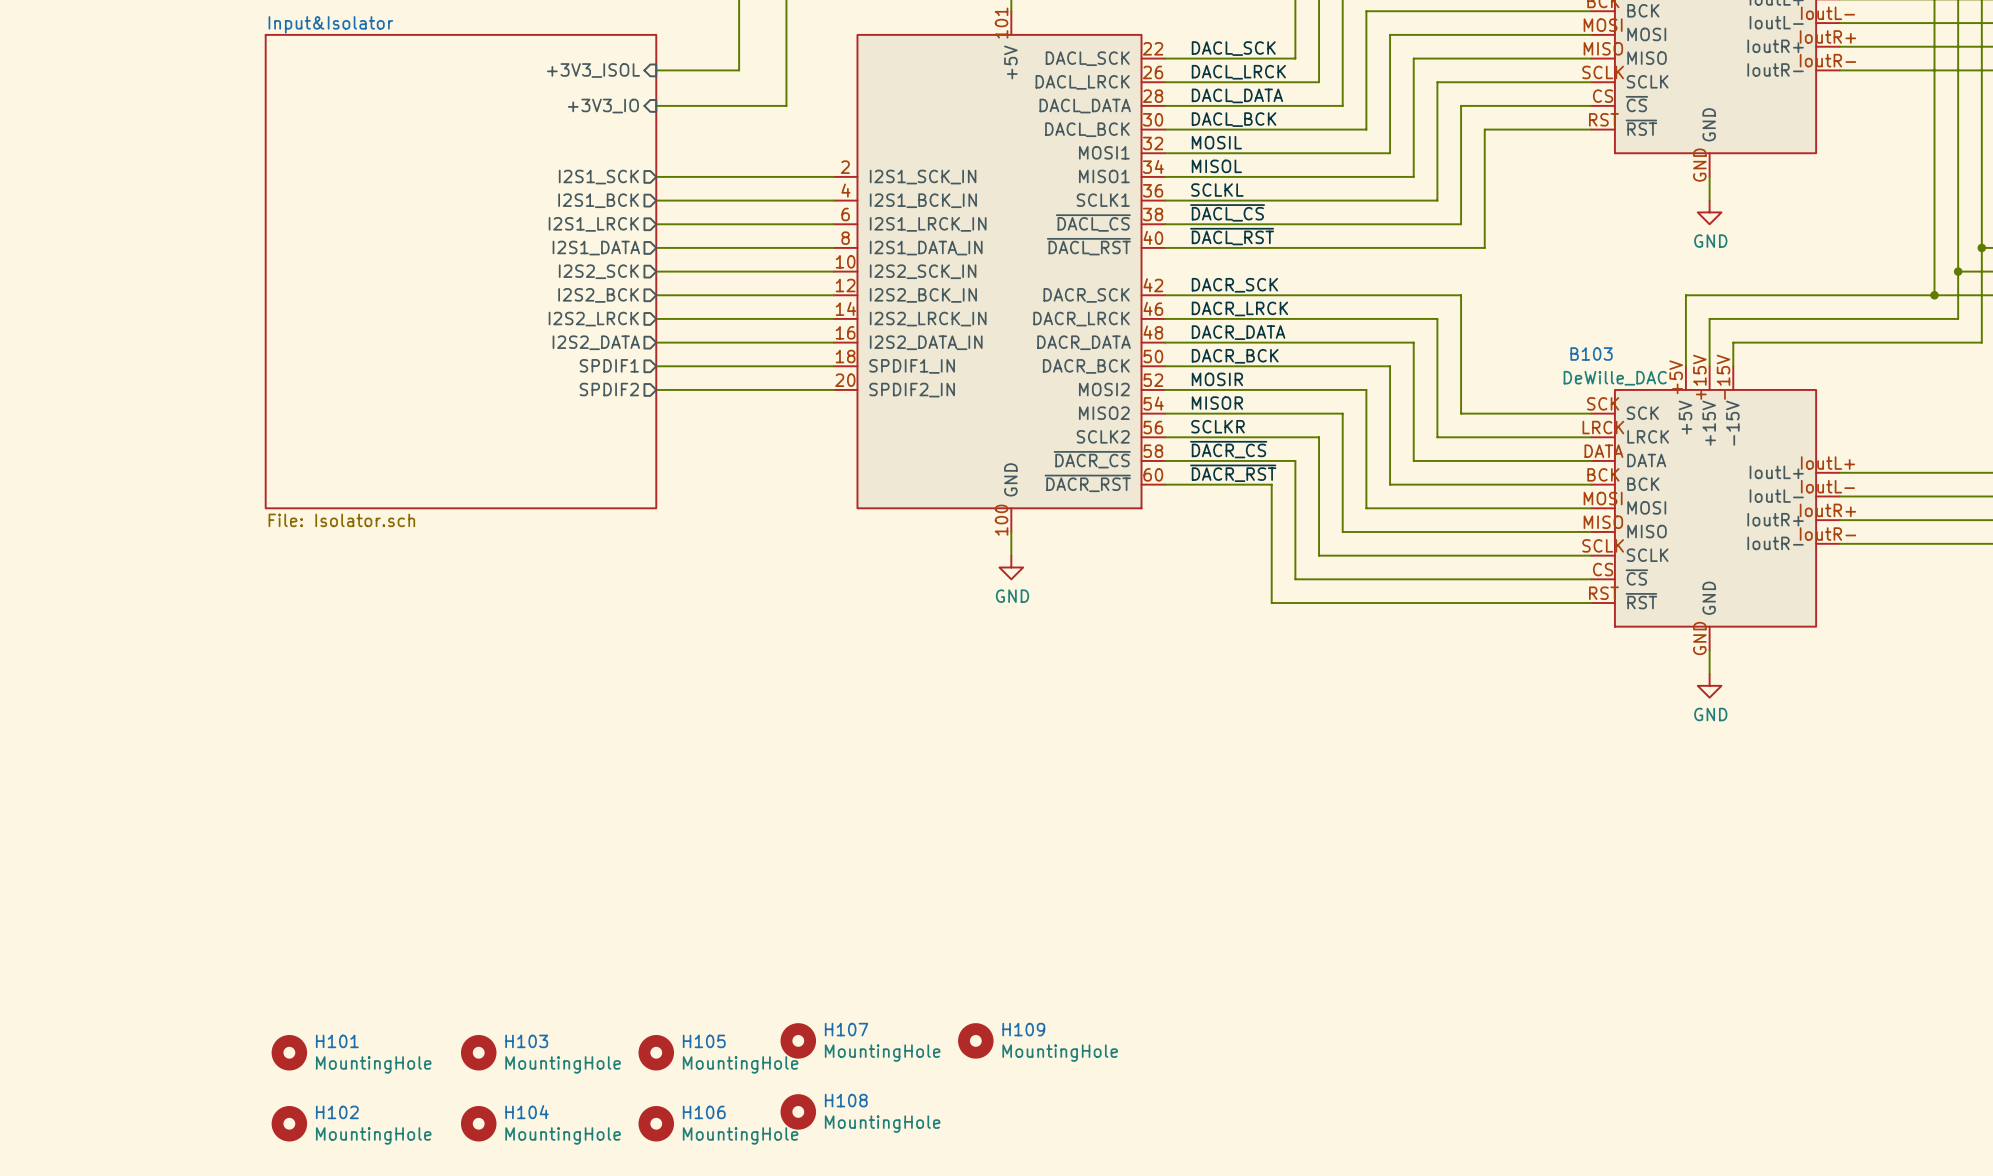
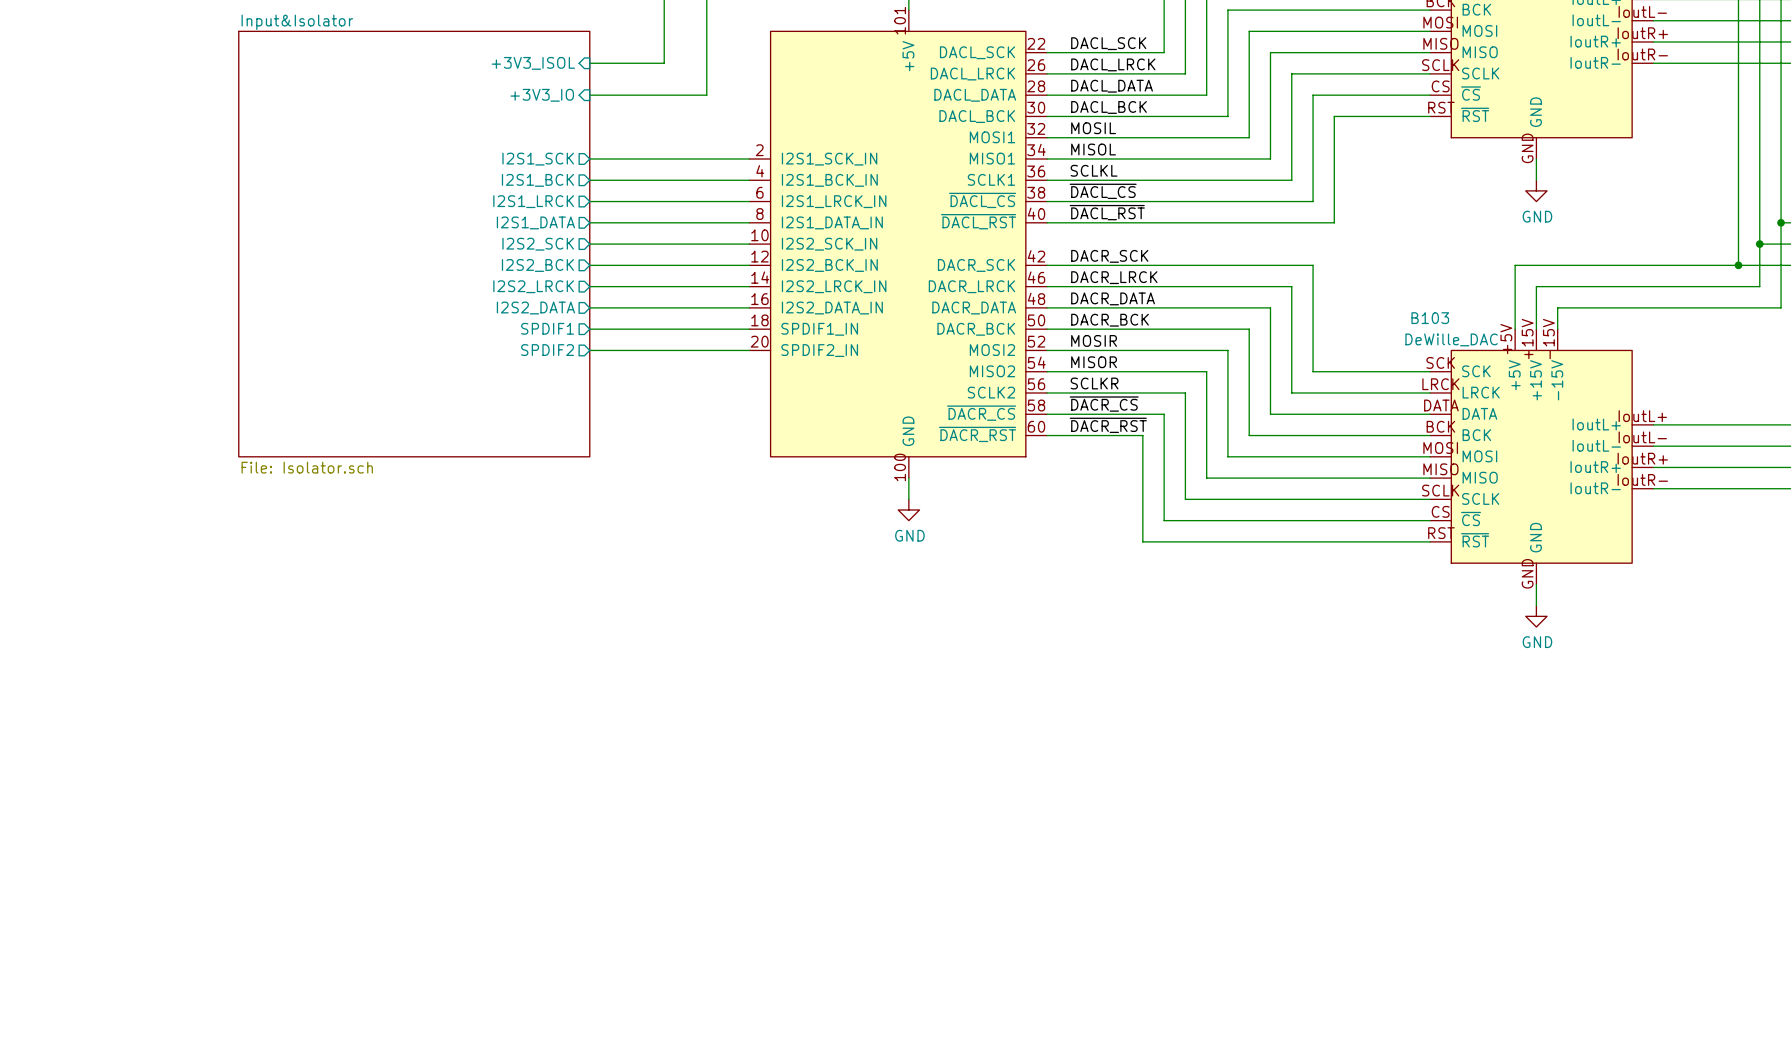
H107: MountingHole (798, 1040) -> none
H109: MountingHole (975, 1040) -> none
H101: MountingHole (289, 1052) -> none
H103: MountingHole (478, 1052) -> none
H105: MountingHole (656, 1052) -> none
H108: MountingHole (798, 1111) -> none
H102: MountingHole (289, 1123) -> none
H104: MountingHole (478, 1123) -> none
H106: MountingHole (656, 1123) -> none

